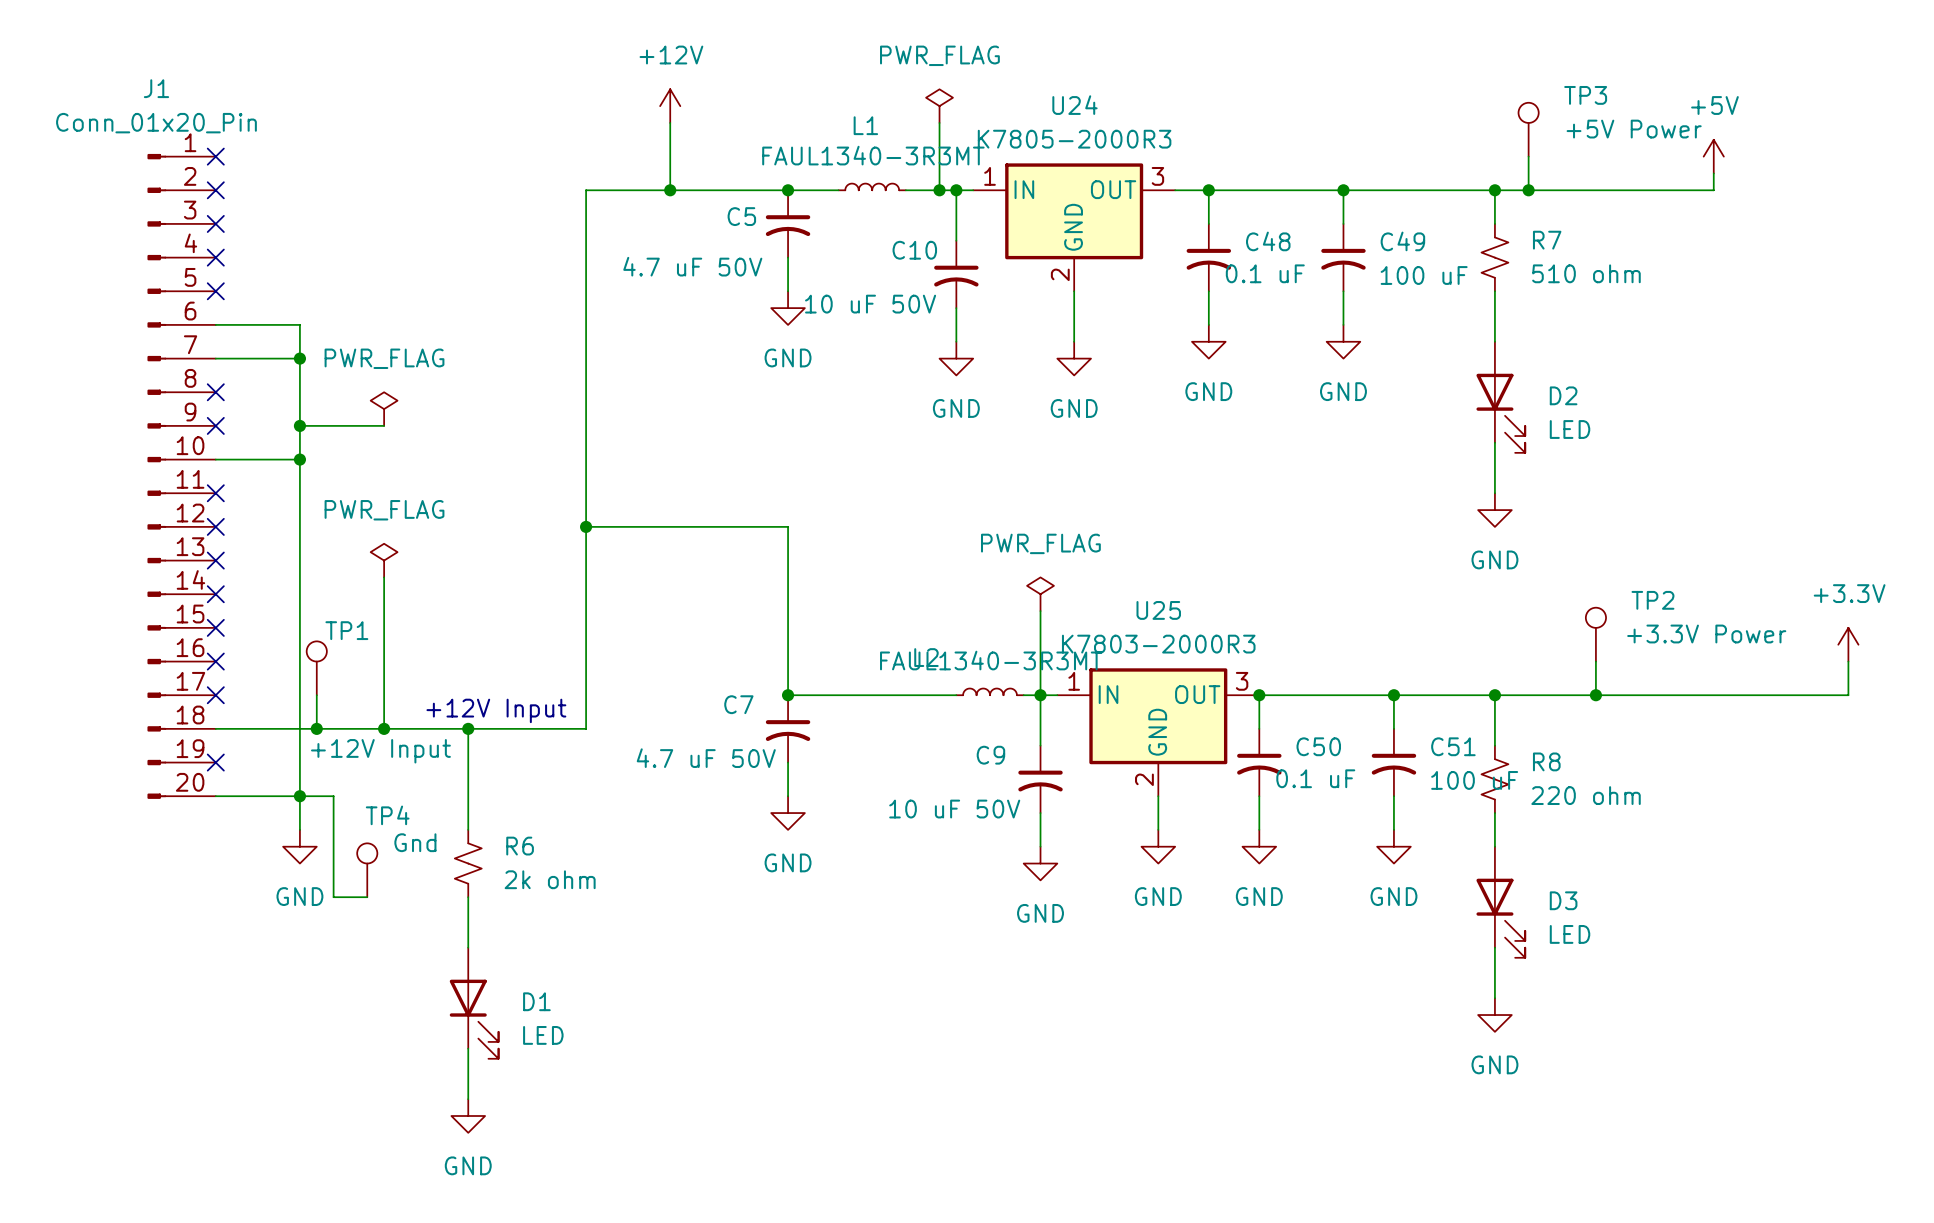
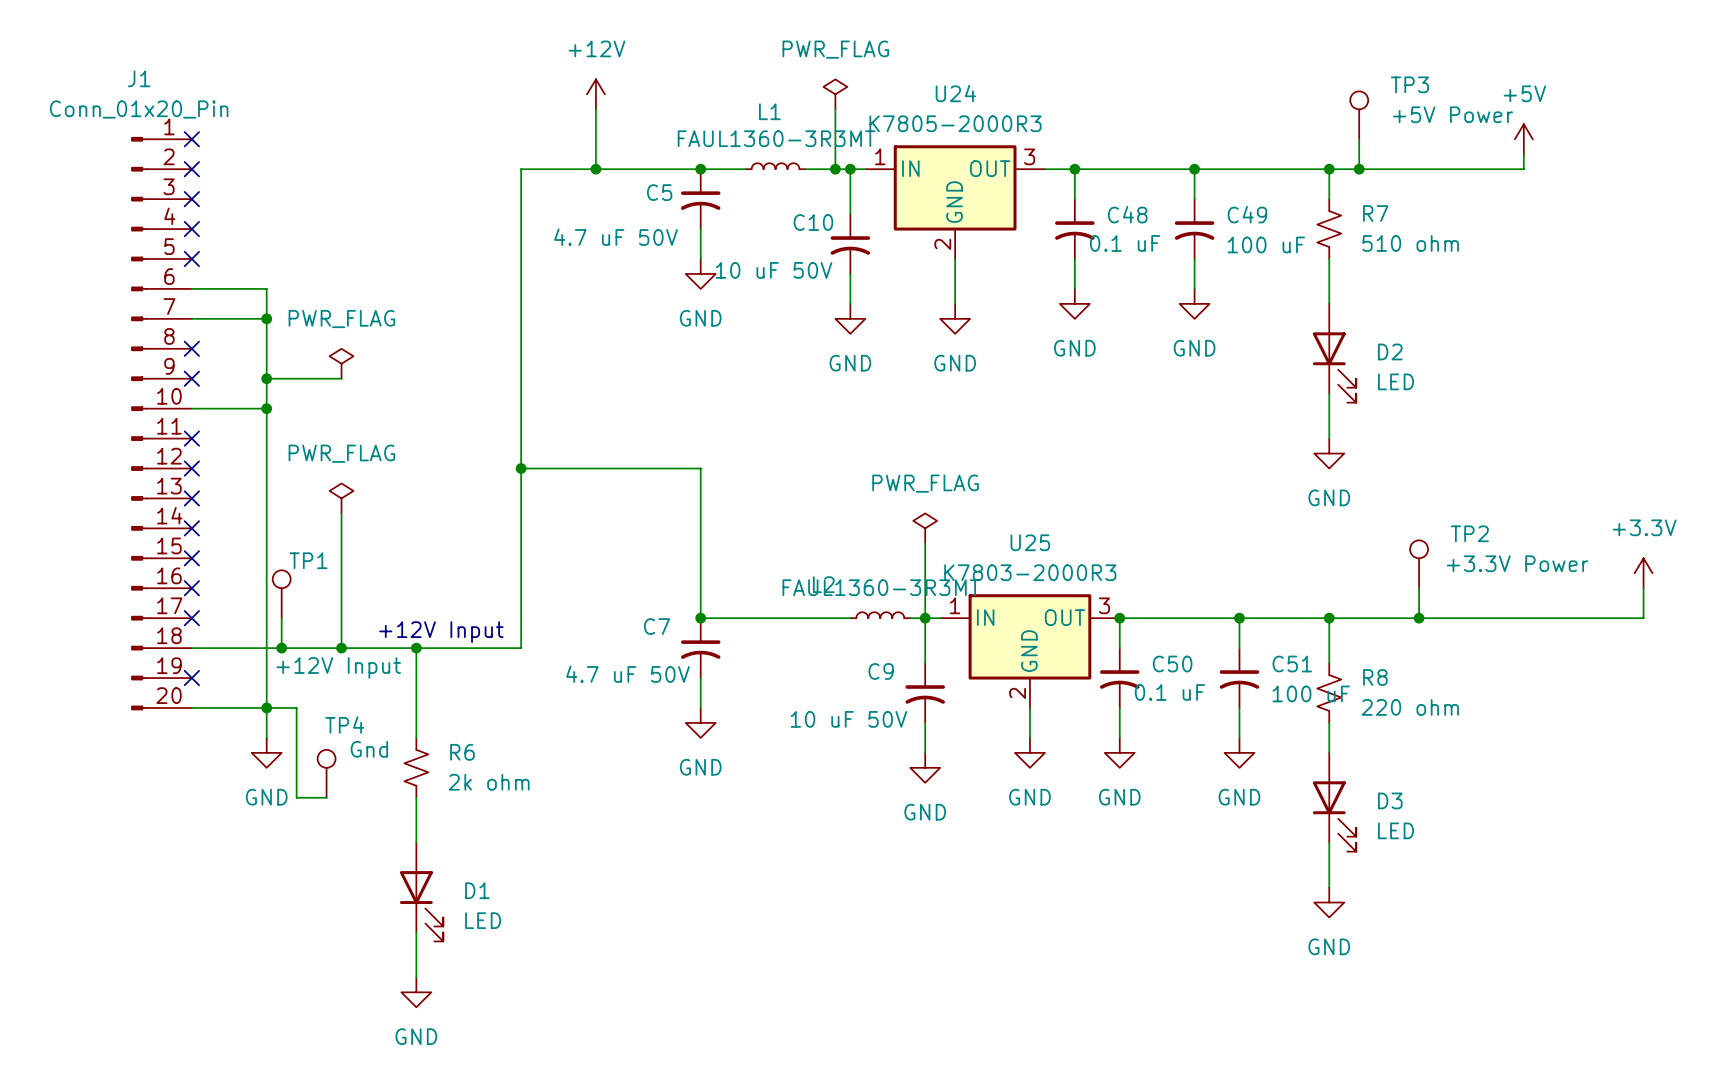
L1 value: FAUL1340-3R3MT (873, 155) -> FAUL1360-3R3MT (776, 138)
L2 value: FAUL1340-3R3MT (991, 660) -> FAUL1360-3R3MT (881, 587)

